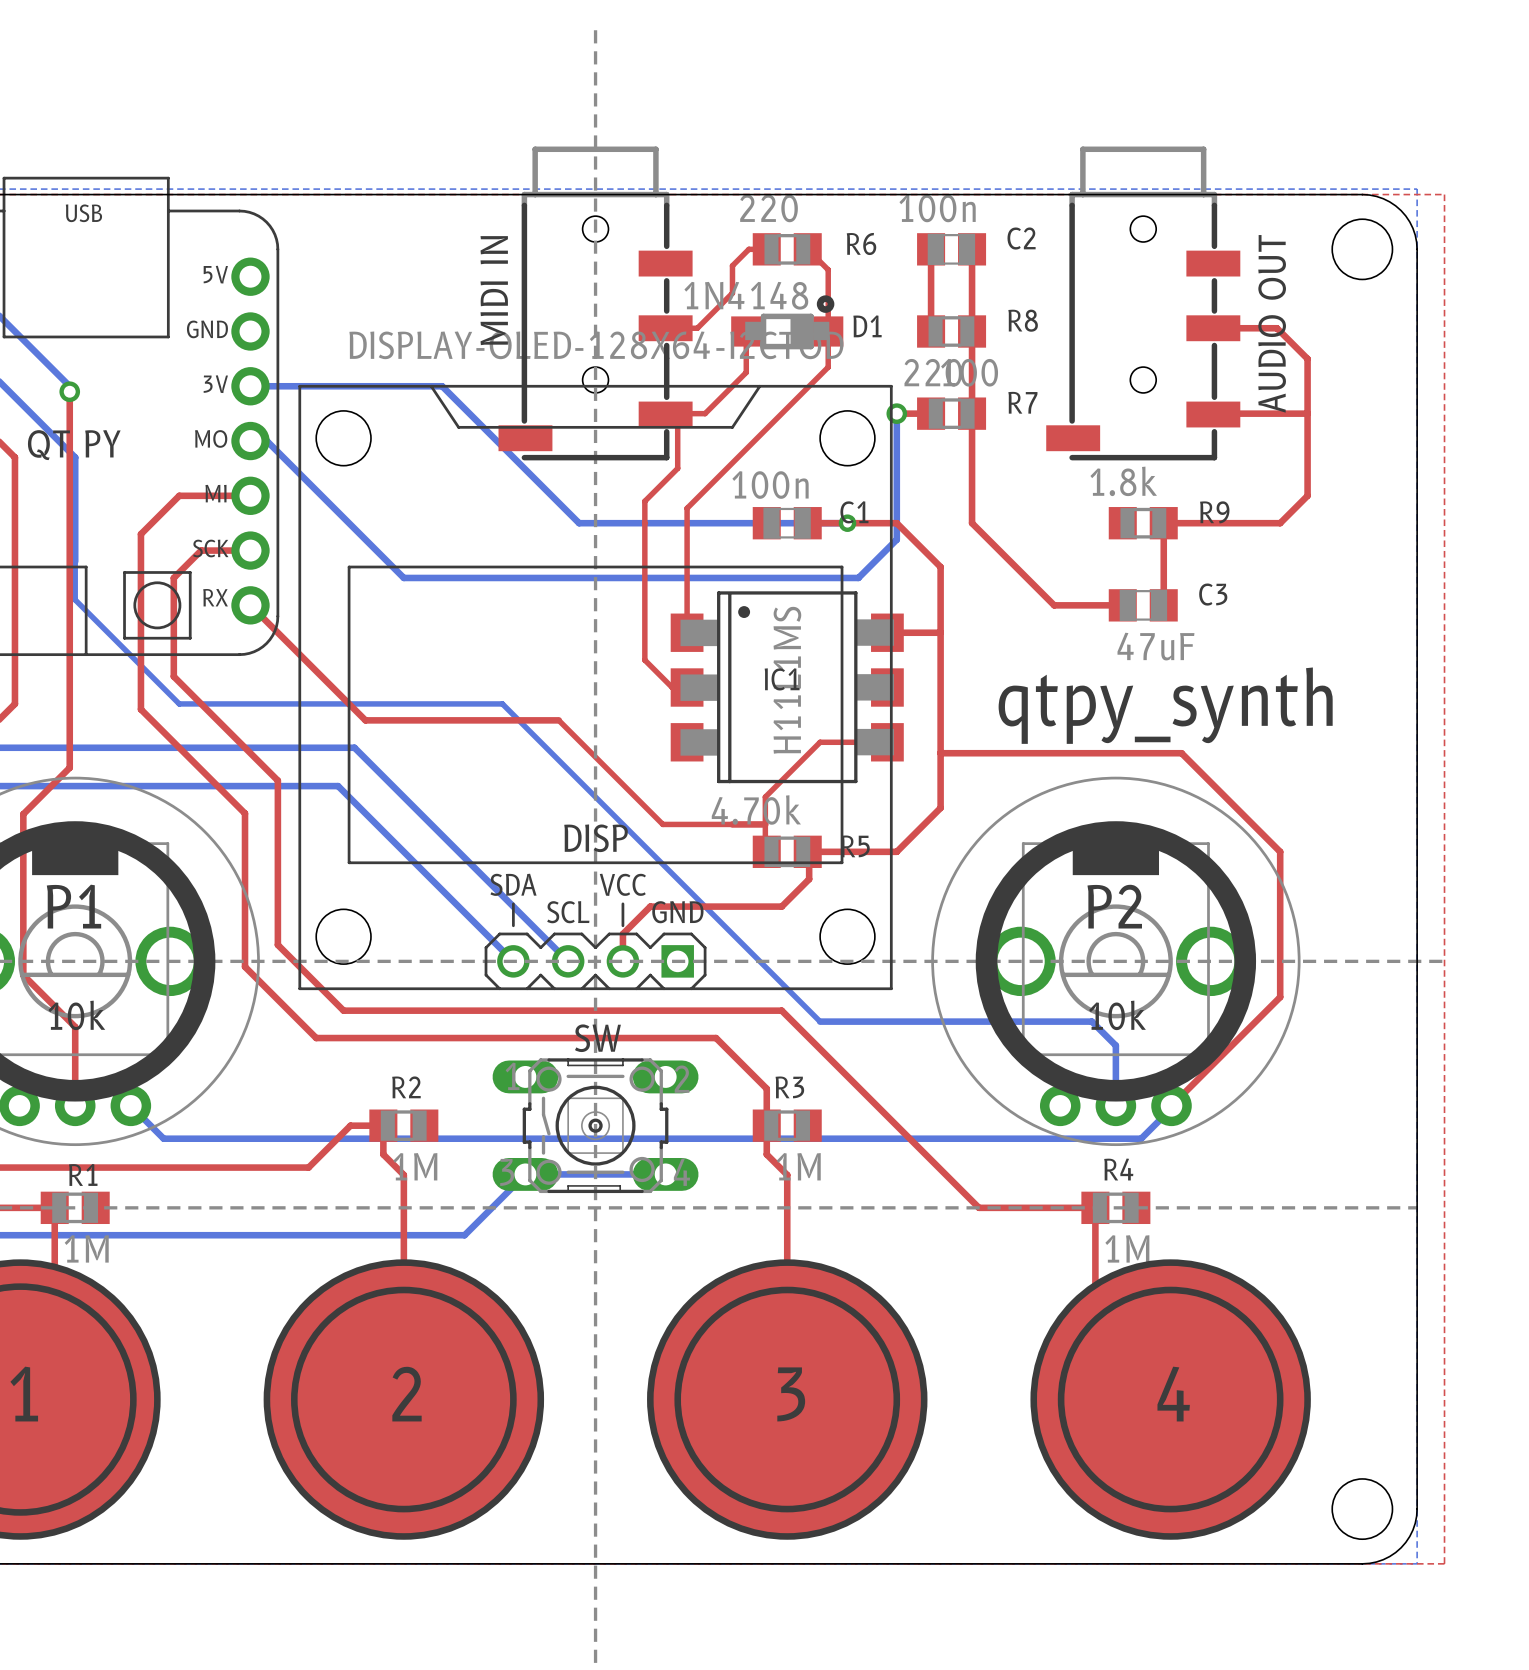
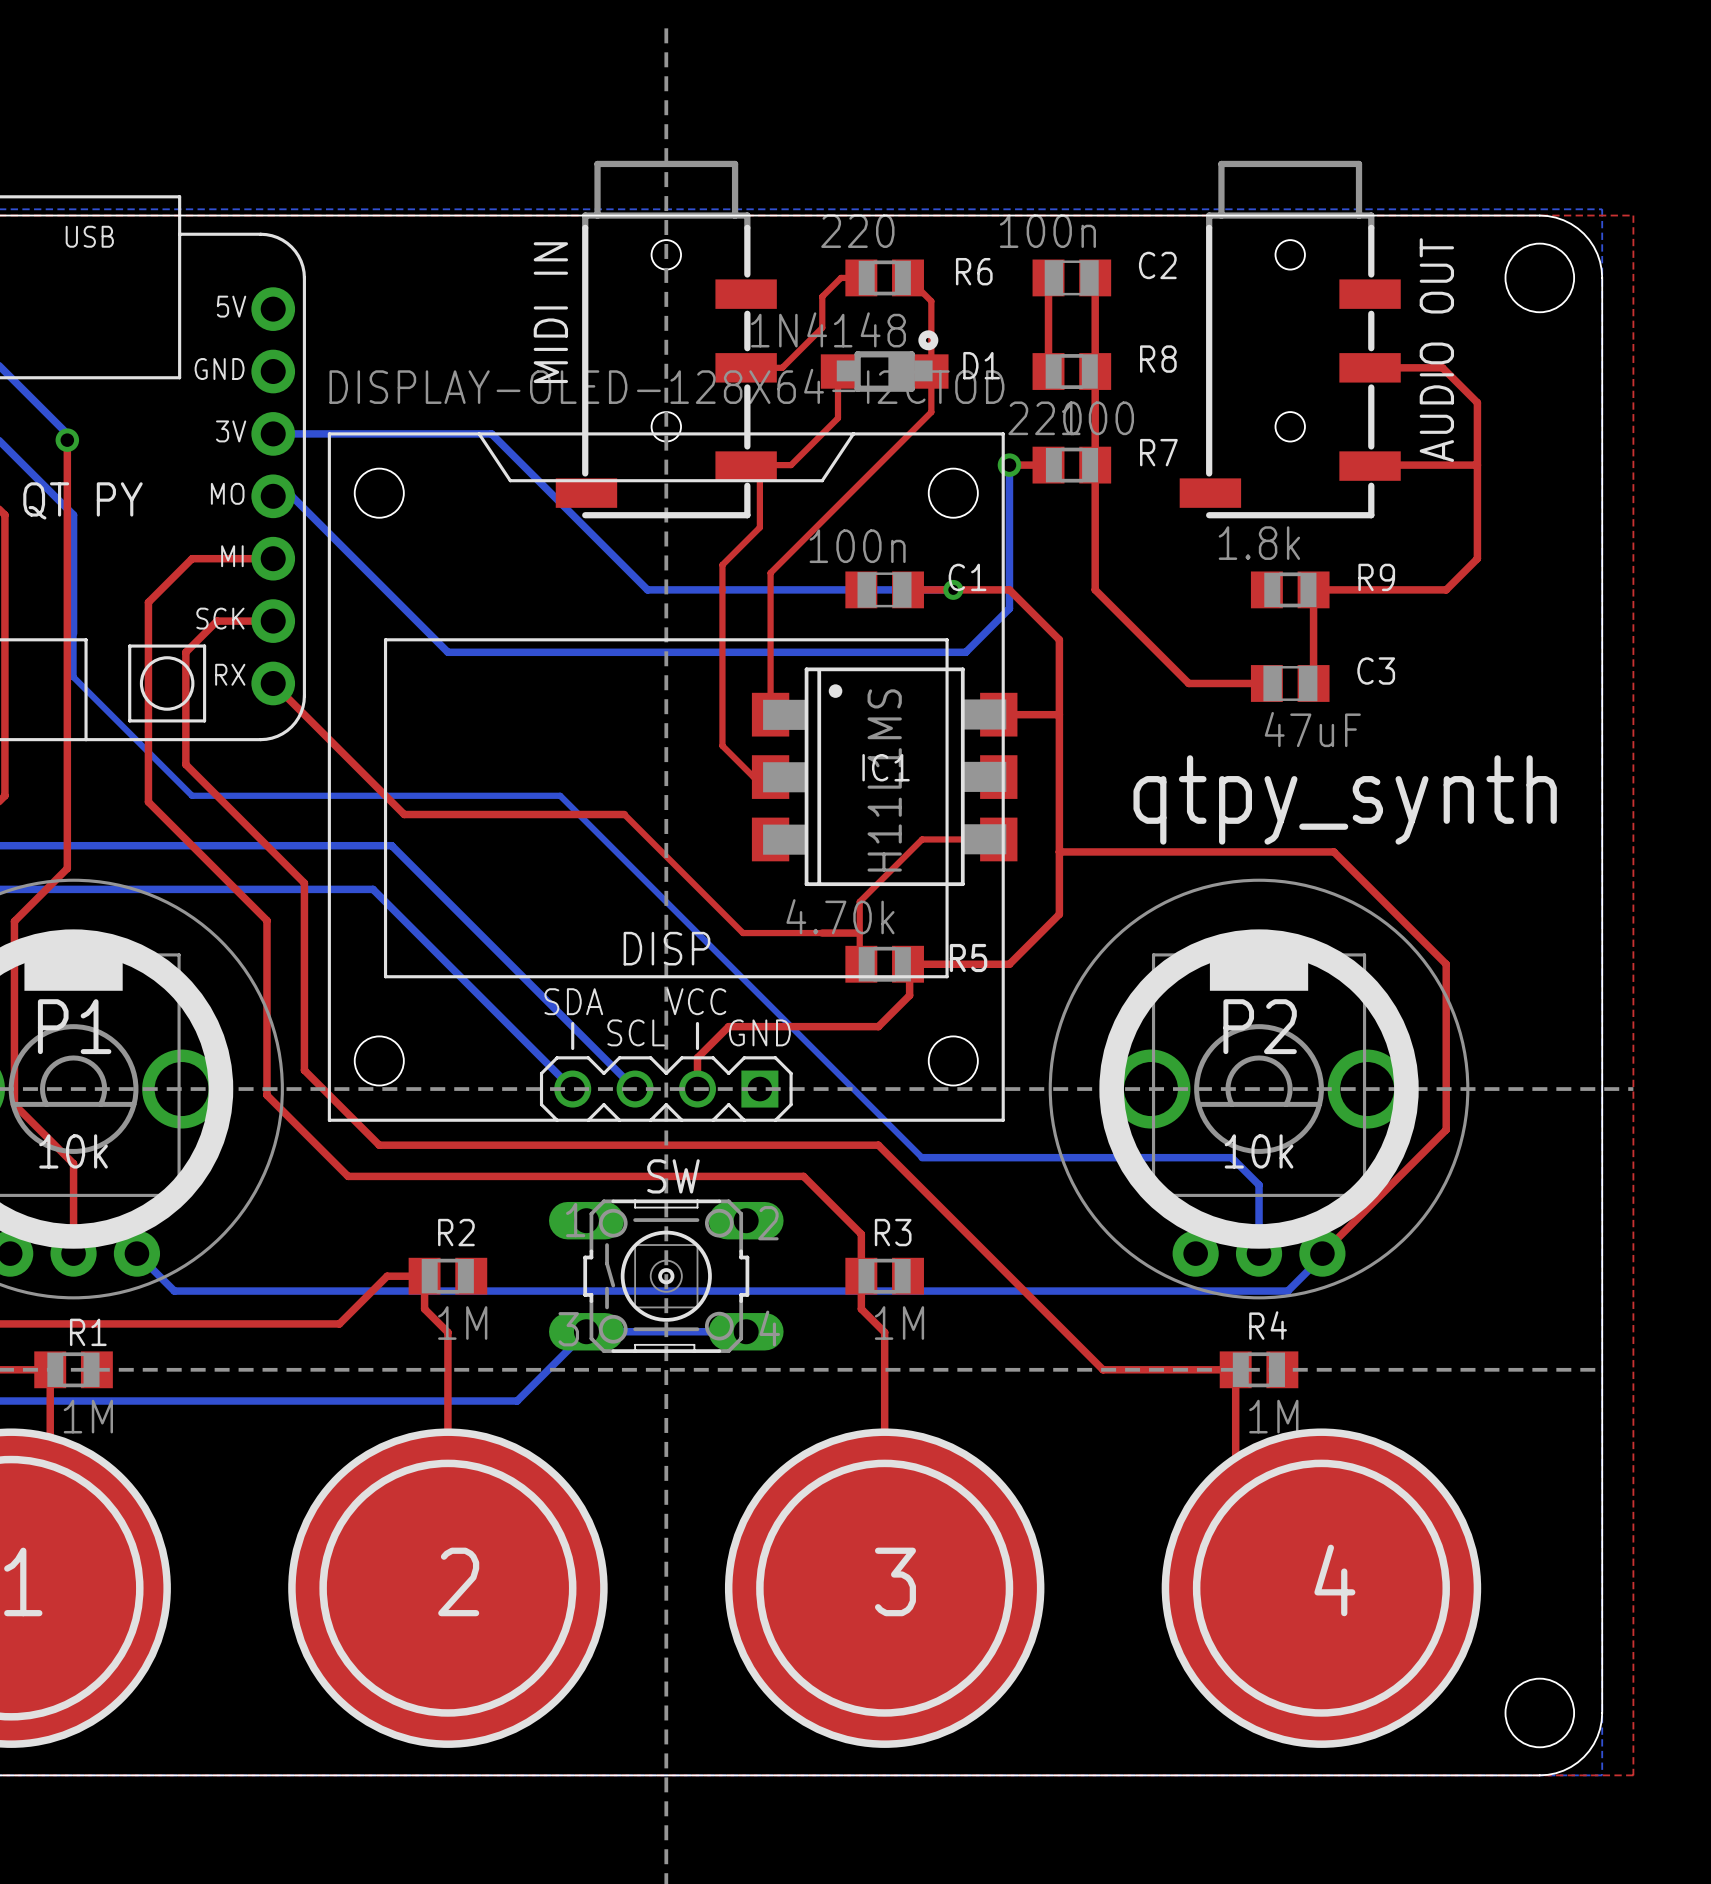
DISP footprint: [298, 384, 893, 991] -> [327, 432, 1005, 1122]

